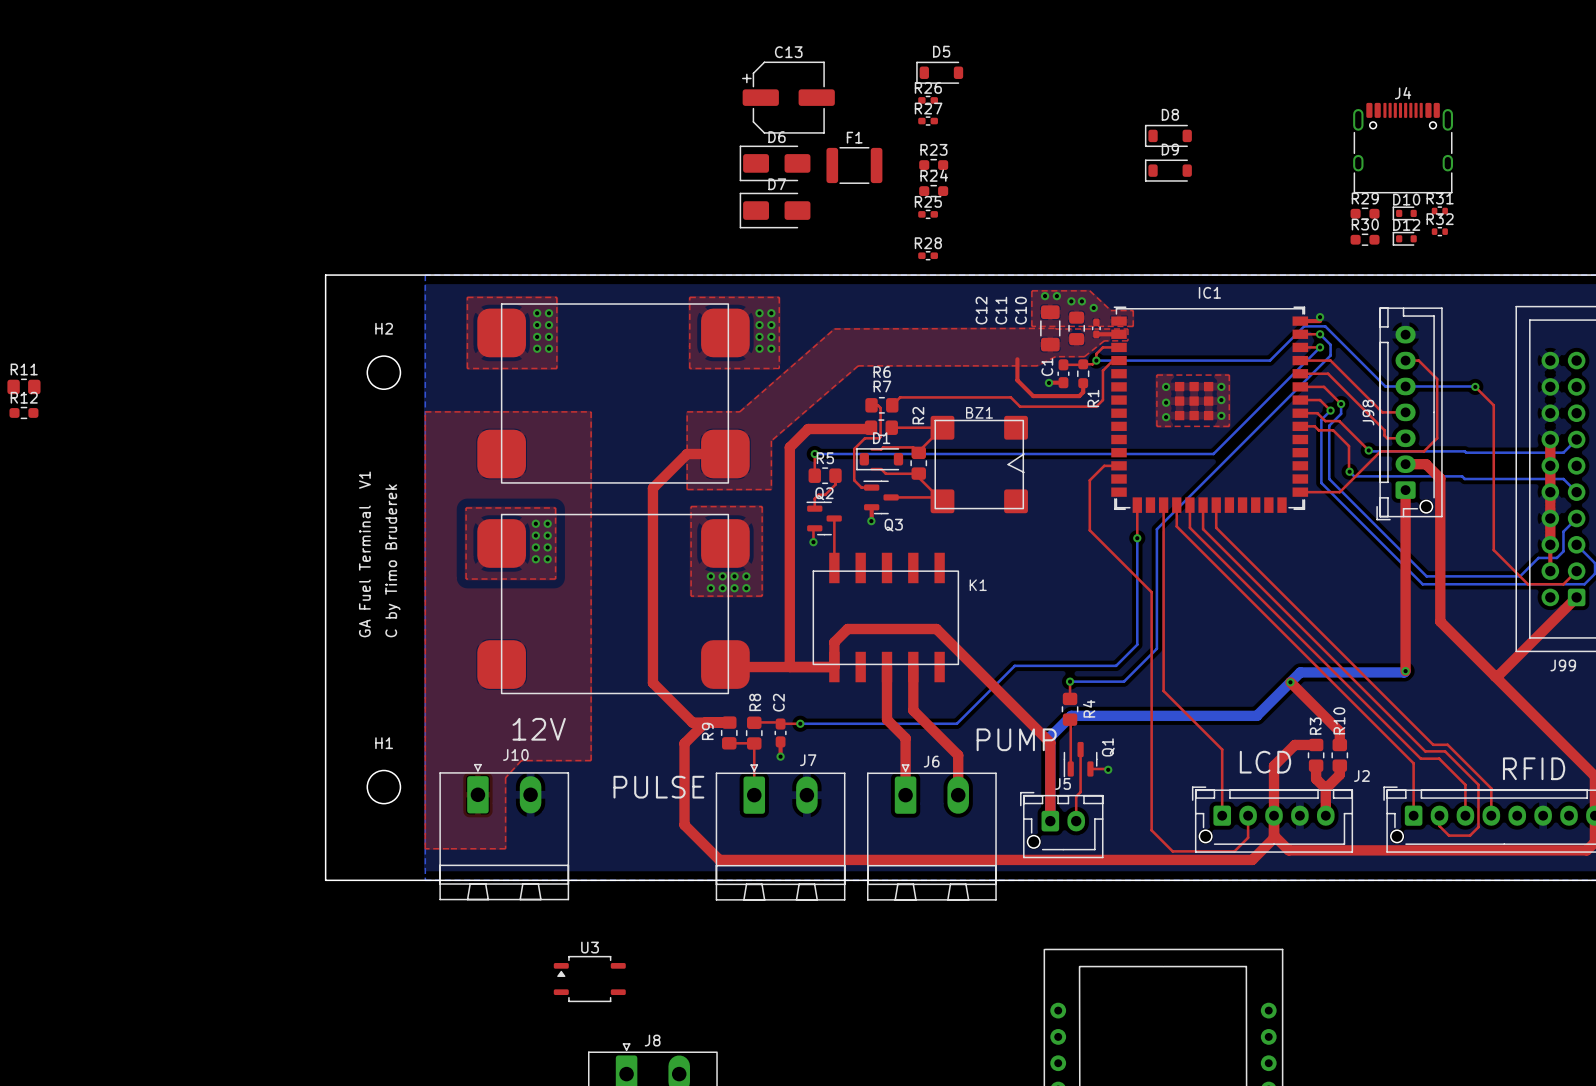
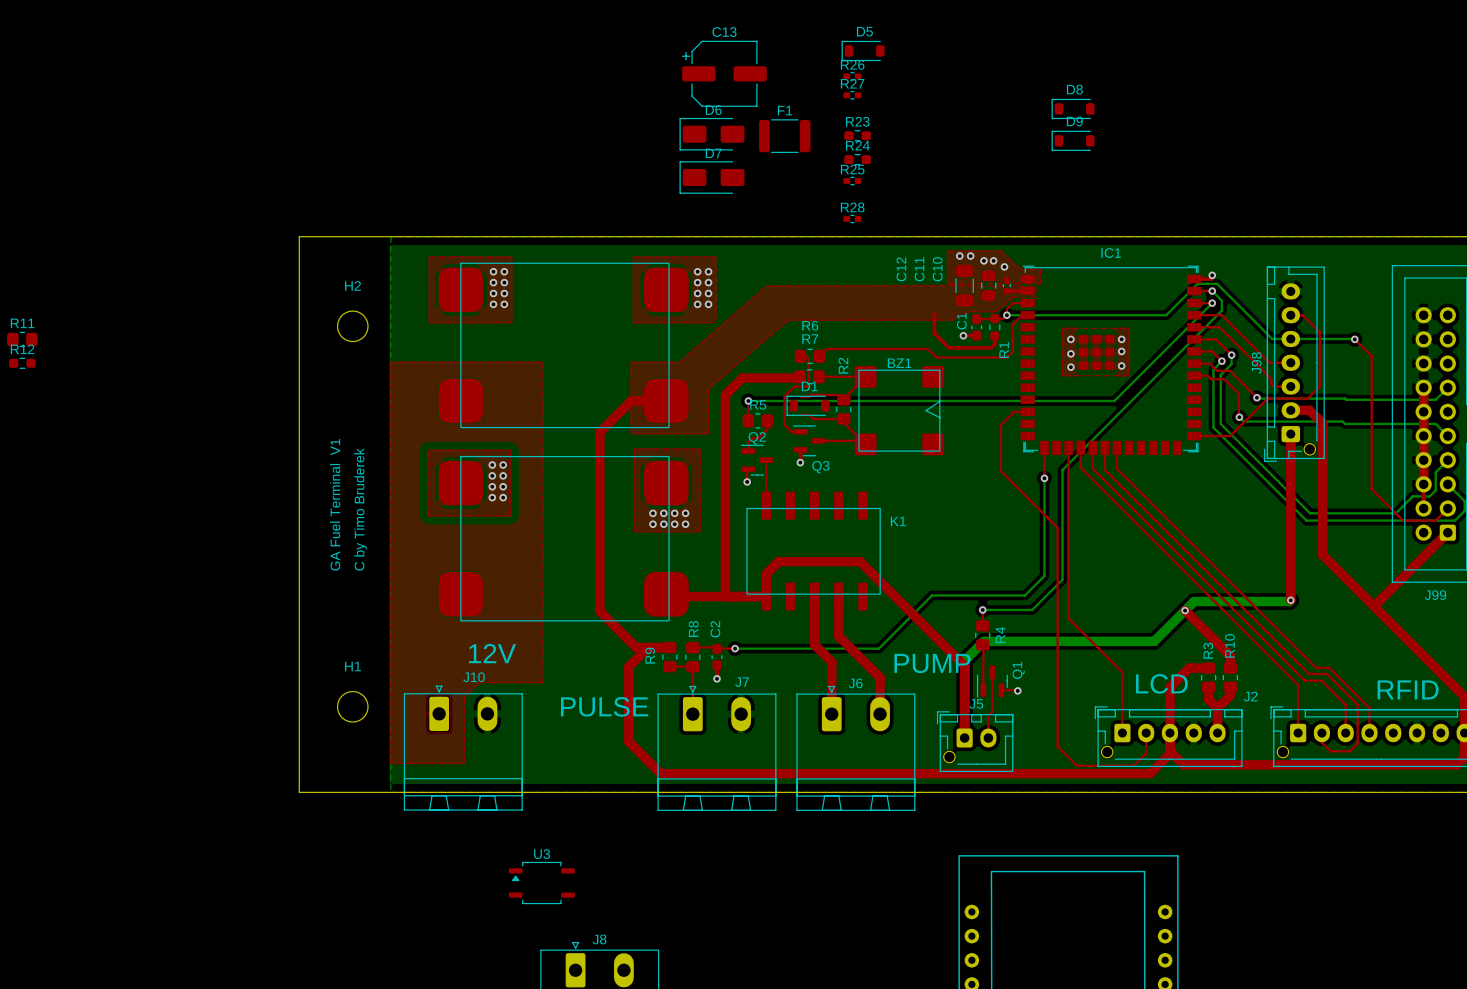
J4: (1403, 148) -> none
R31: (1439, 211) -> none
R29: (1365, 213) -> none
D10: (1404, 213) -> none
R32: (1439, 231) -> none
D12: (1404, 238) -> none
R30: (1365, 239) -> none

